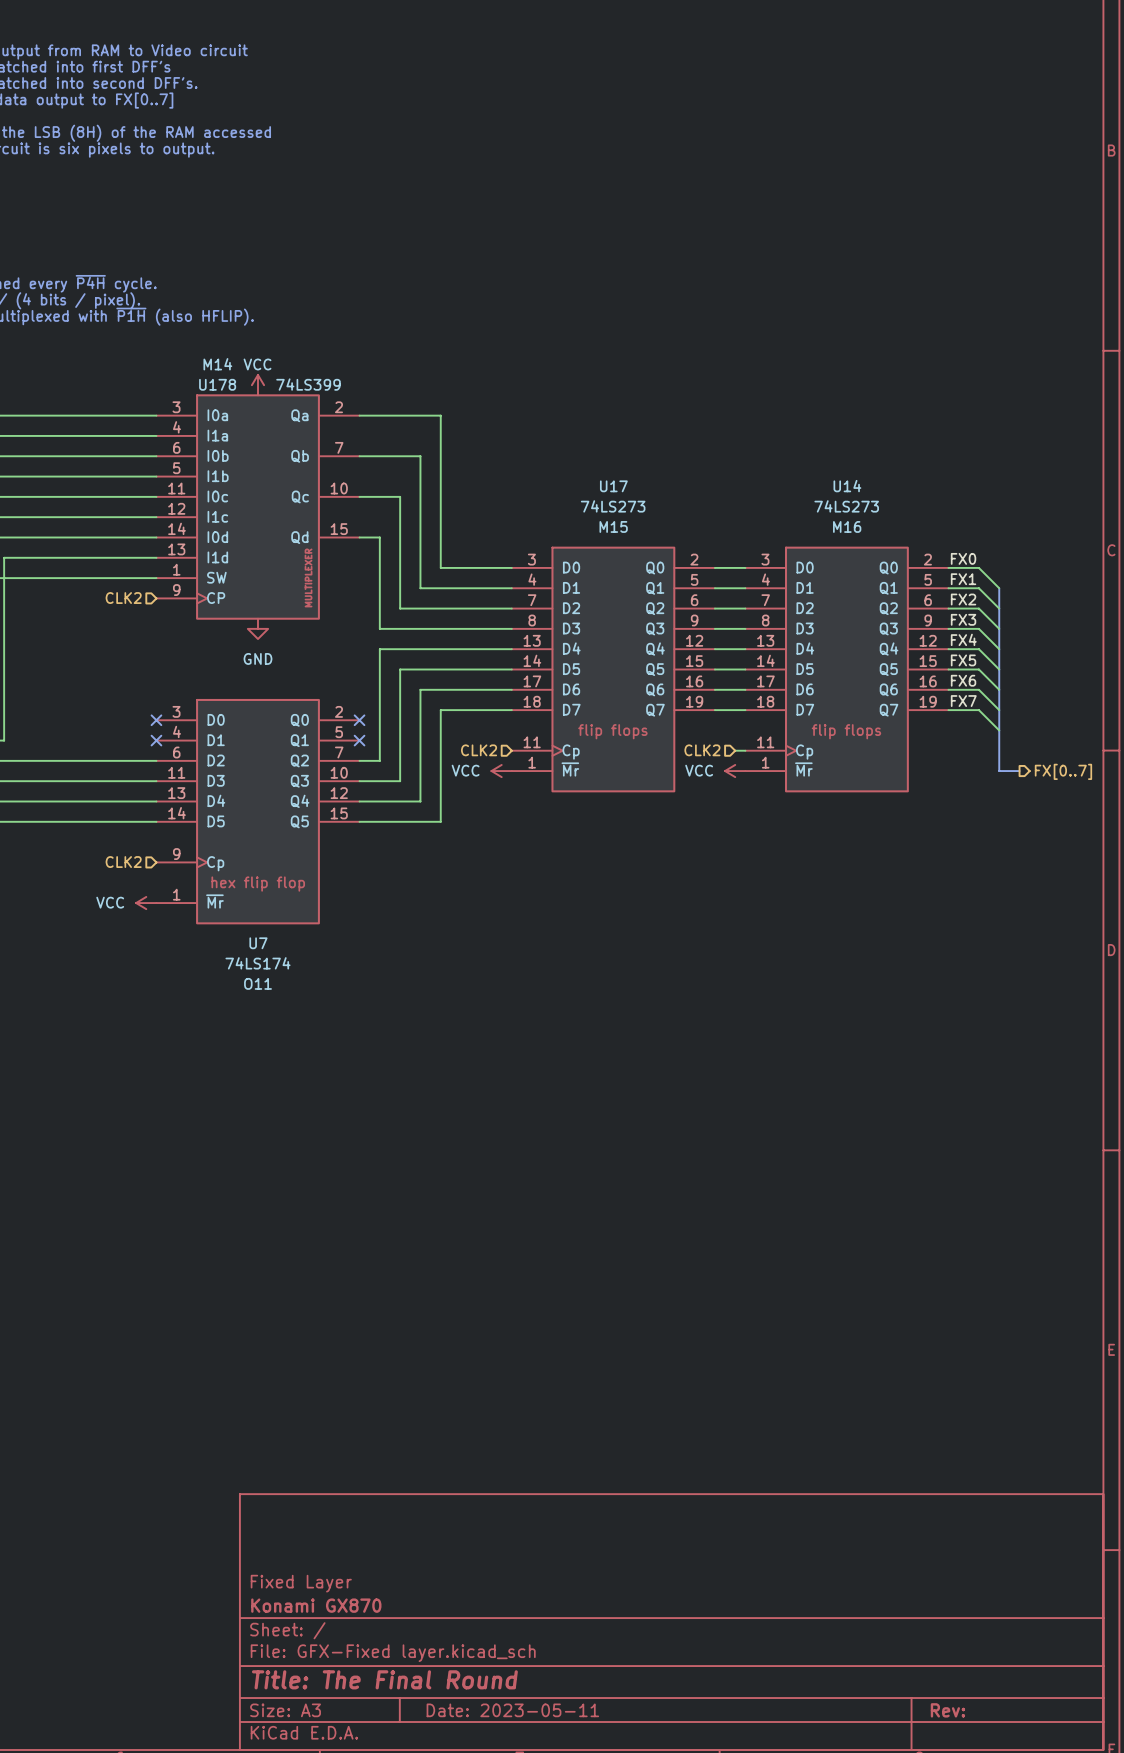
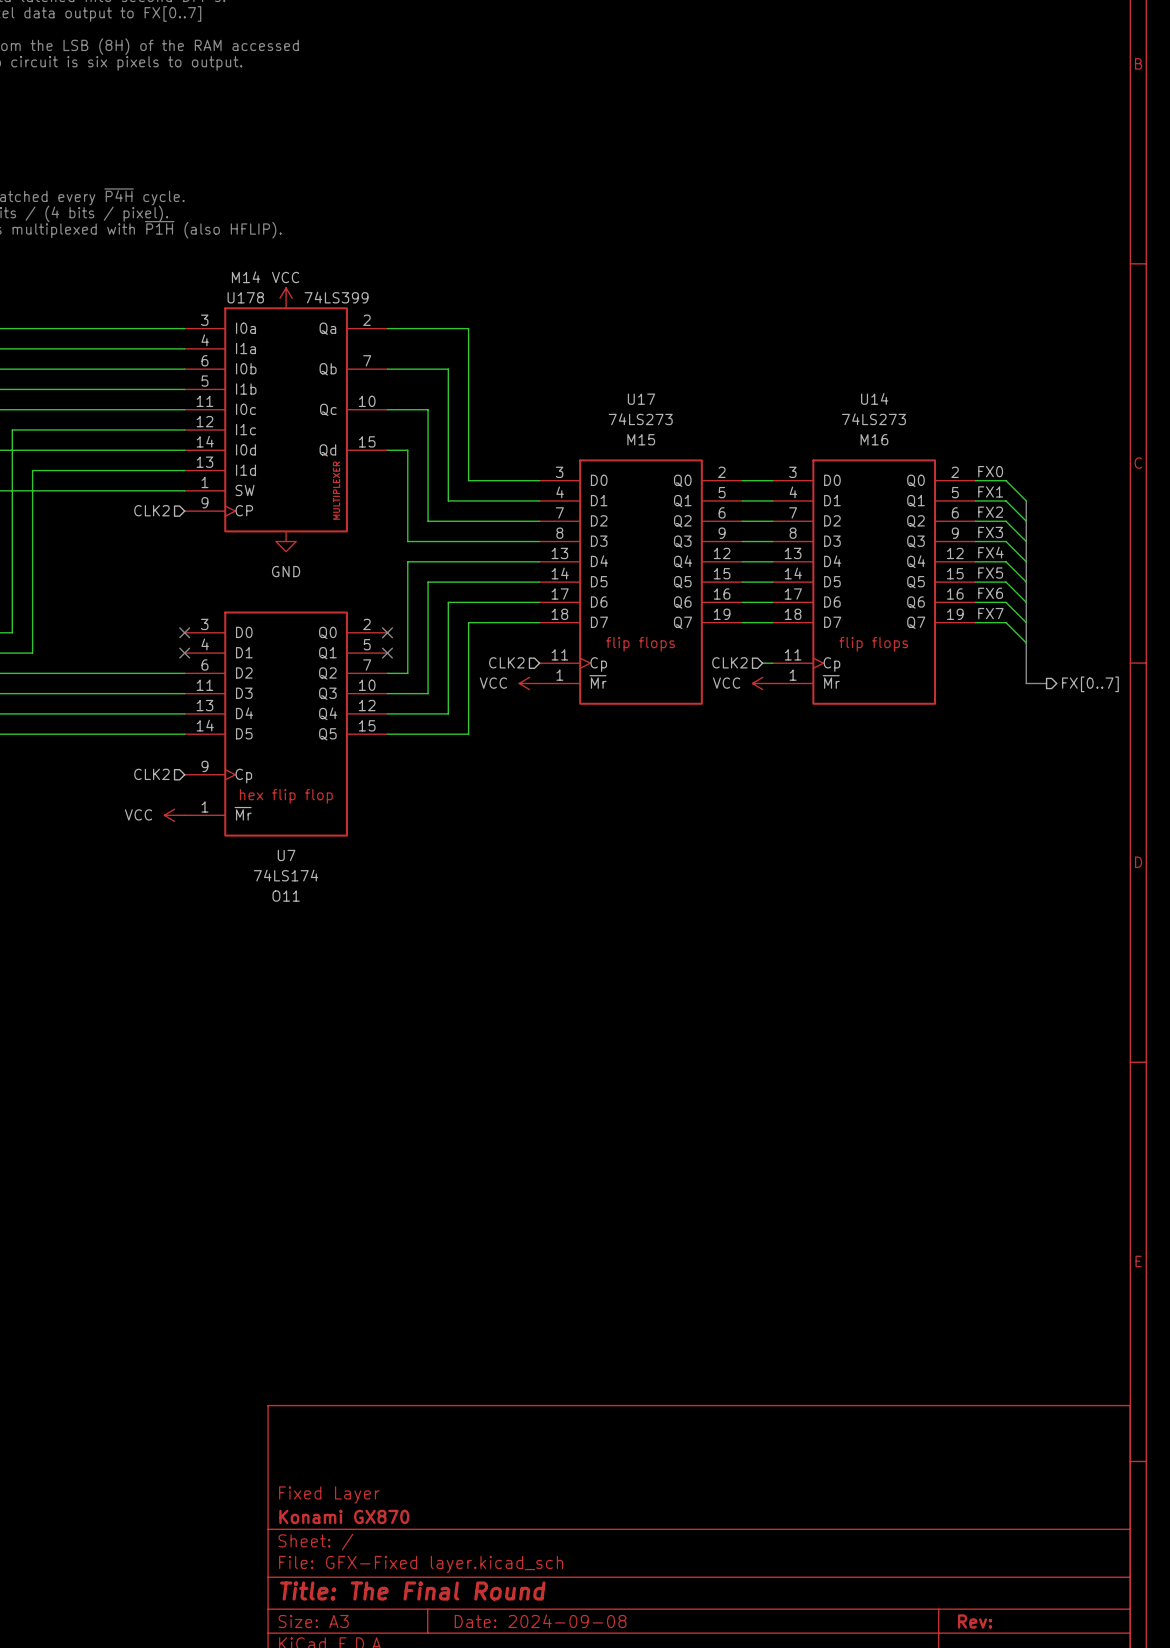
title block: Date: 2023-05-11 (512, 1710) -> Date: 2024-09-08 (540, 1621)

